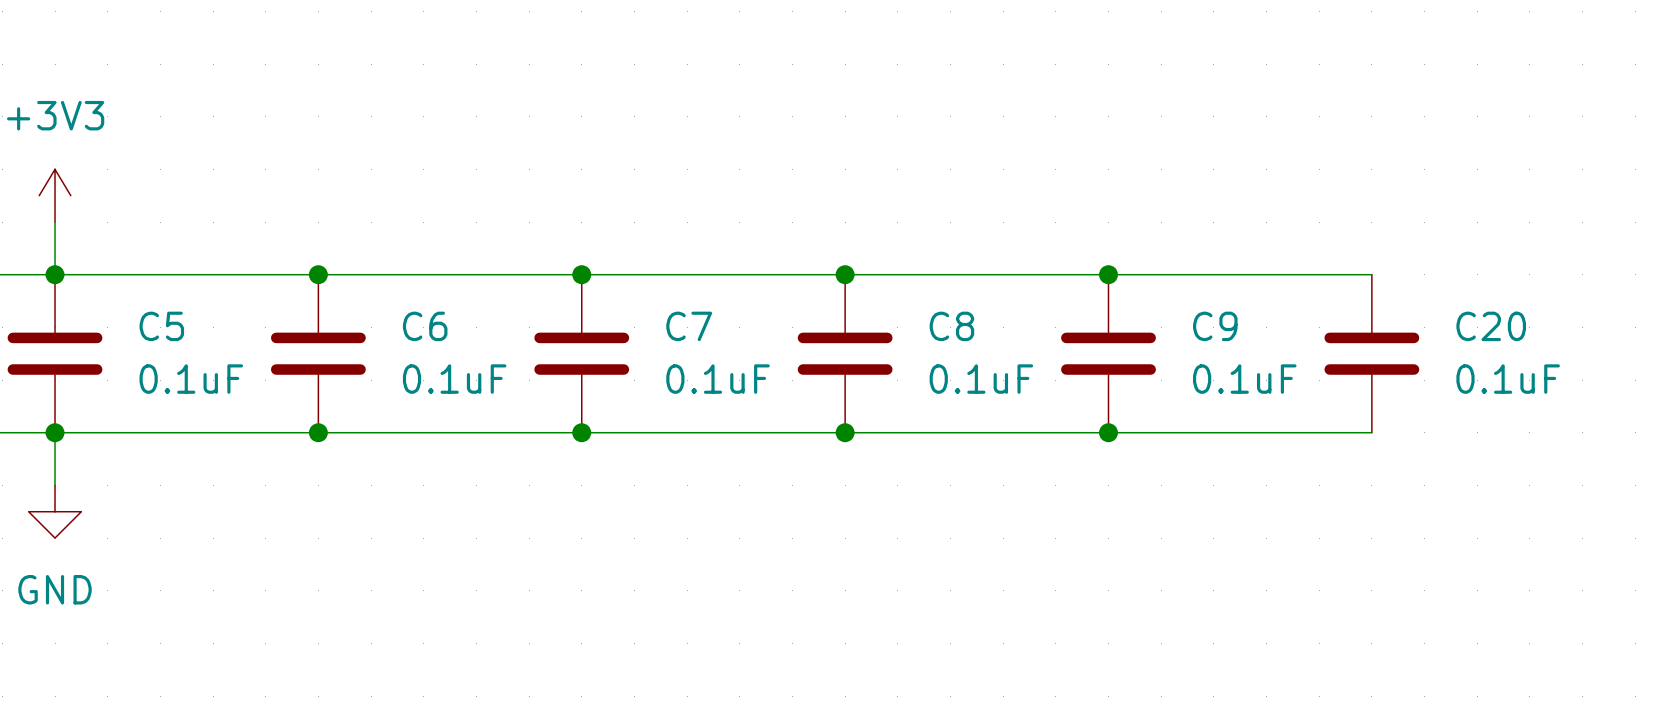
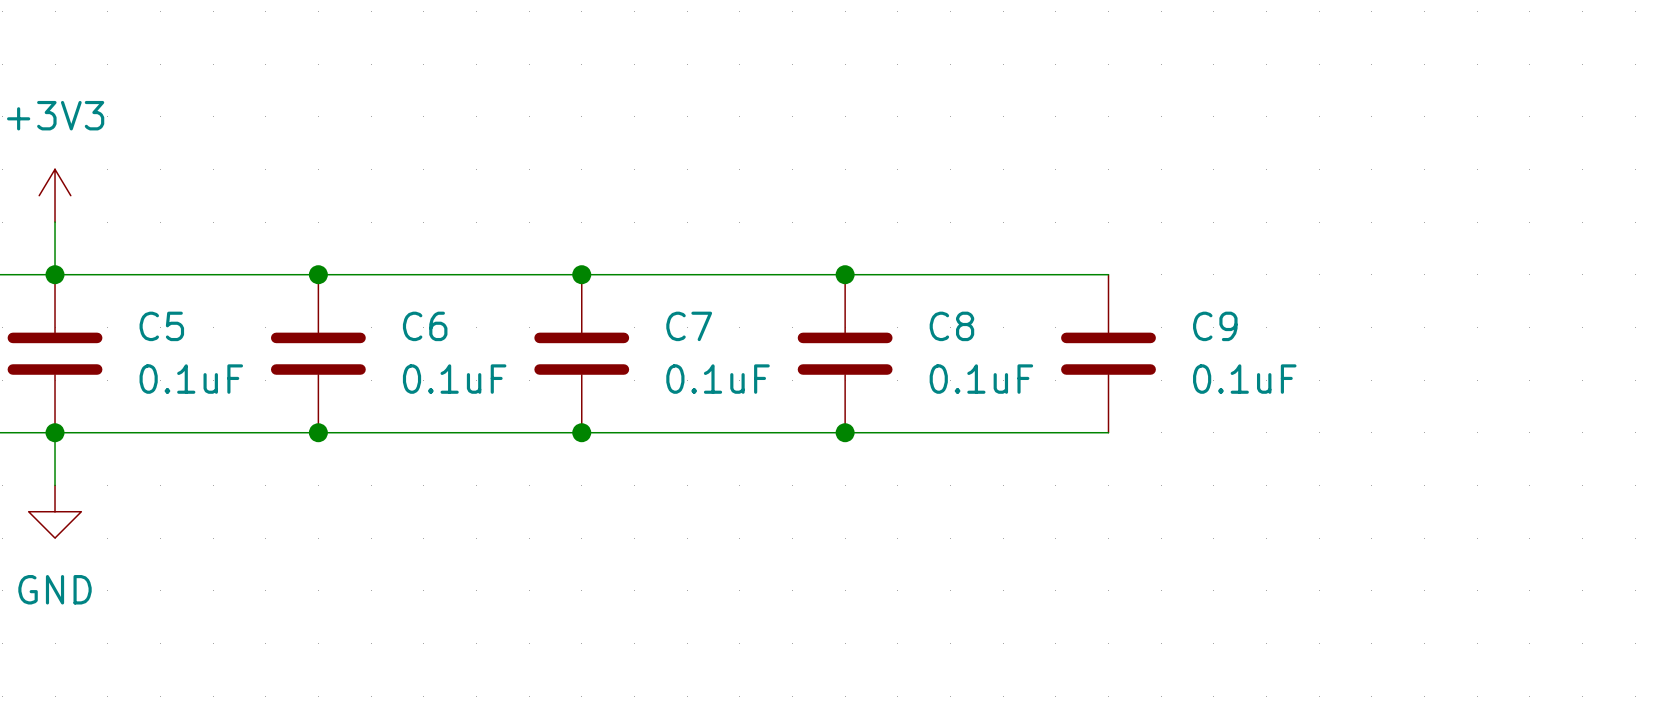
wire: (1108, 274) (1371, 274) -> none
junction: (1108, 274) -> none
C20: 0.1uF (1371, 353) -> none
wire: (1108, 432) (1371, 432) -> none
junction: (1108, 432) -> none

